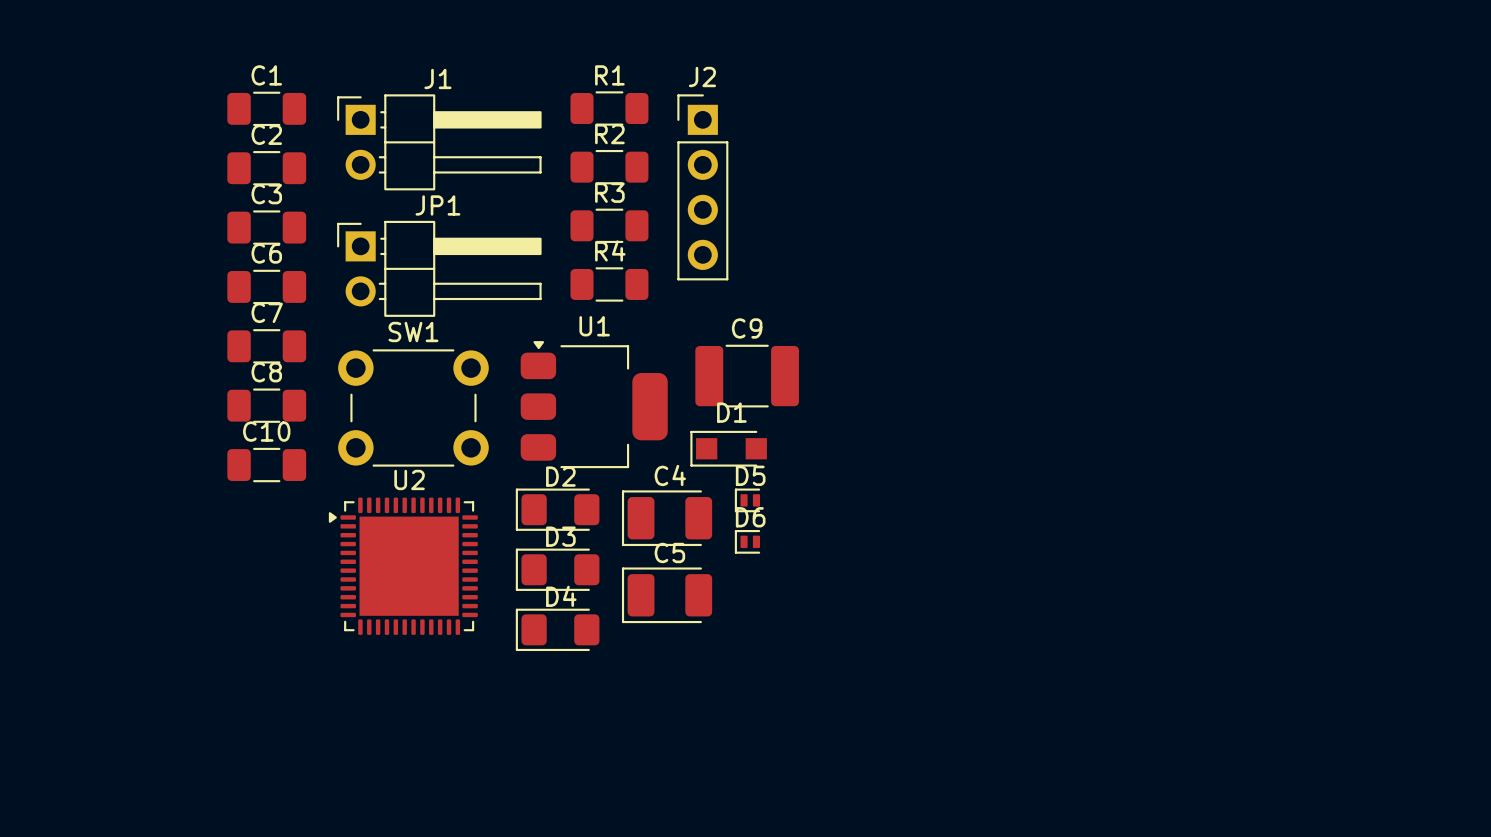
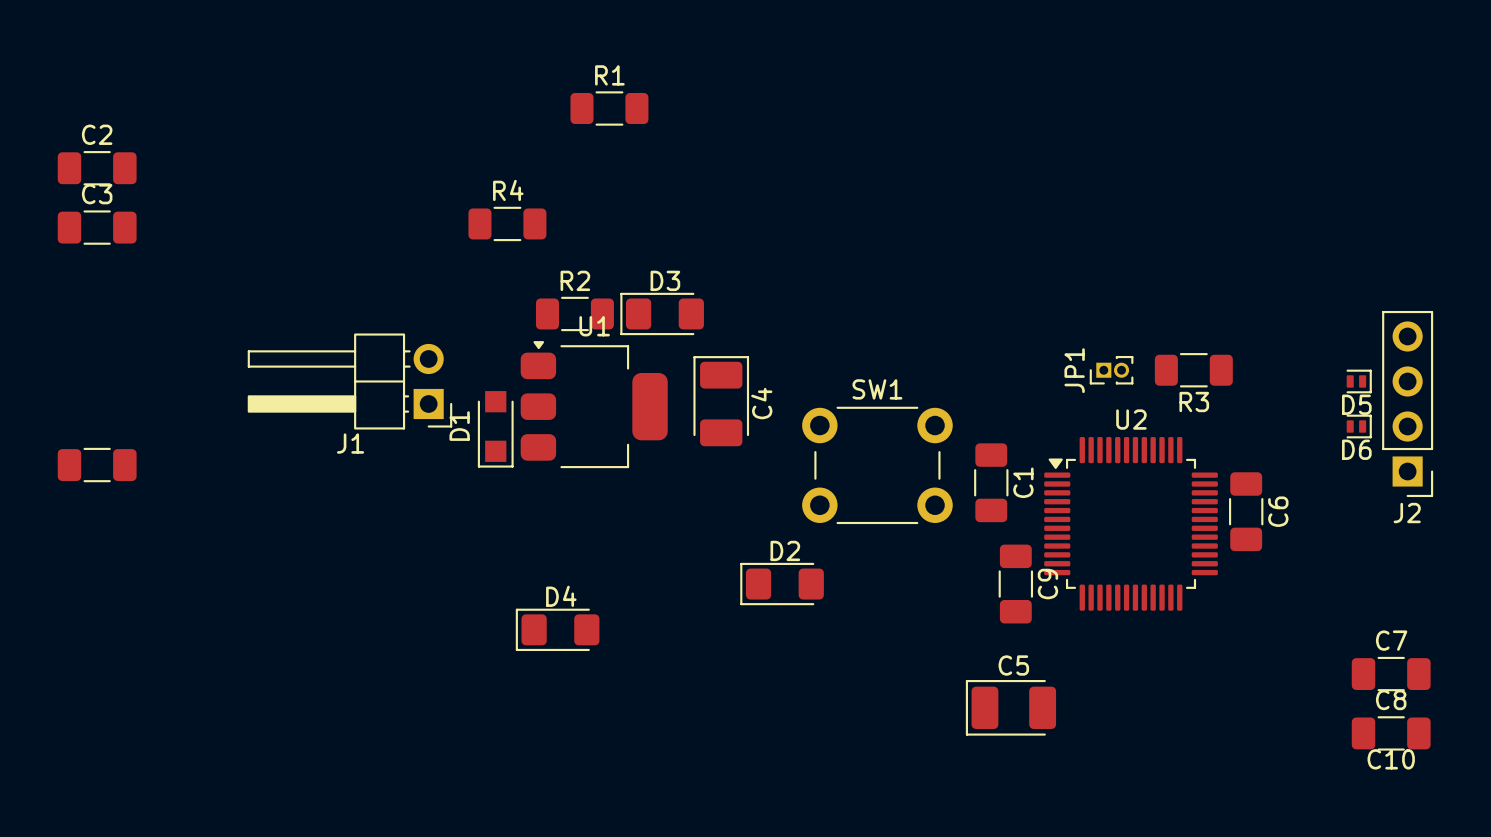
C1 rotation: 0° (266, 108) -> 90° clockwise (991, 482)
C1 position: (266, 108) -> (991, 482)
J1 rotation: 0° (439, 142) -> 180° (349, 381)
J1 position: (439, 142) -> (349, 381)
R2 position: (609, 167) -> (574, 313)
C2 position: (266, 168) -> (97, 168)
J2 rotation: 0° (702, 187) -> 180° (1407, 403)
J2 position: (702, 187) -> (1407, 403)
R3 name position: R3 (609, 192) -> R3 (1194, 402)
JP1 name position: JP1 (437, 205) -> JP1 (1074, 370)
JP1 footprint: [337, 220, 542, 317] -> [1089, 355, 1134, 385]
R3 position: (609, 225) -> (1193, 370)
C3 position: (266, 227) -> (97, 227)
R4 position: (609, 284) -> (507, 223)
C6 rotation: 0° (266, 286) -> 90° clockwise (1246, 511)
C6 position: (266, 286) -> (1246, 511)
C9 name position: C9 (747, 328) -> C9 (1047, 584)
C9 footprint: [695, 344, 799, 408] -> [998, 544, 1034, 624]
C7 position: (266, 346) -> (1391, 674)
C8 position: (266, 405) -> (1391, 733)
SW1 position: (413, 407) -> (877, 465)
C10 name position: C10 (266, 431) -> C10 (1391, 759)
D1 rotation: 0° (728, 448) -> 90° counterclockwise (495, 429)
D1 position: (728, 448) -> (495, 429)
C10 position: (266, 465) -> (97, 465)
U2 footprint: [328, 497, 478, 635] -> [1044, 437, 1218, 611]
D5 rotation: 0° (747, 500) -> 180° (1359, 381)
D5 position: (747, 500) -> (1359, 381)
D2 position: (557, 509) -> (782, 584)
C4 rotation: 0° (667, 518) -> 90° clockwise (721, 401)
C4 position: (667, 518) -> (721, 401)
D6 rotation: 0° (747, 541) -> 180° (1359, 426)
D6 position: (747, 541) -> (1359, 426)
D3 position: (557, 569) -> (662, 313)
C5 position: (667, 595) -> (1010, 707)

